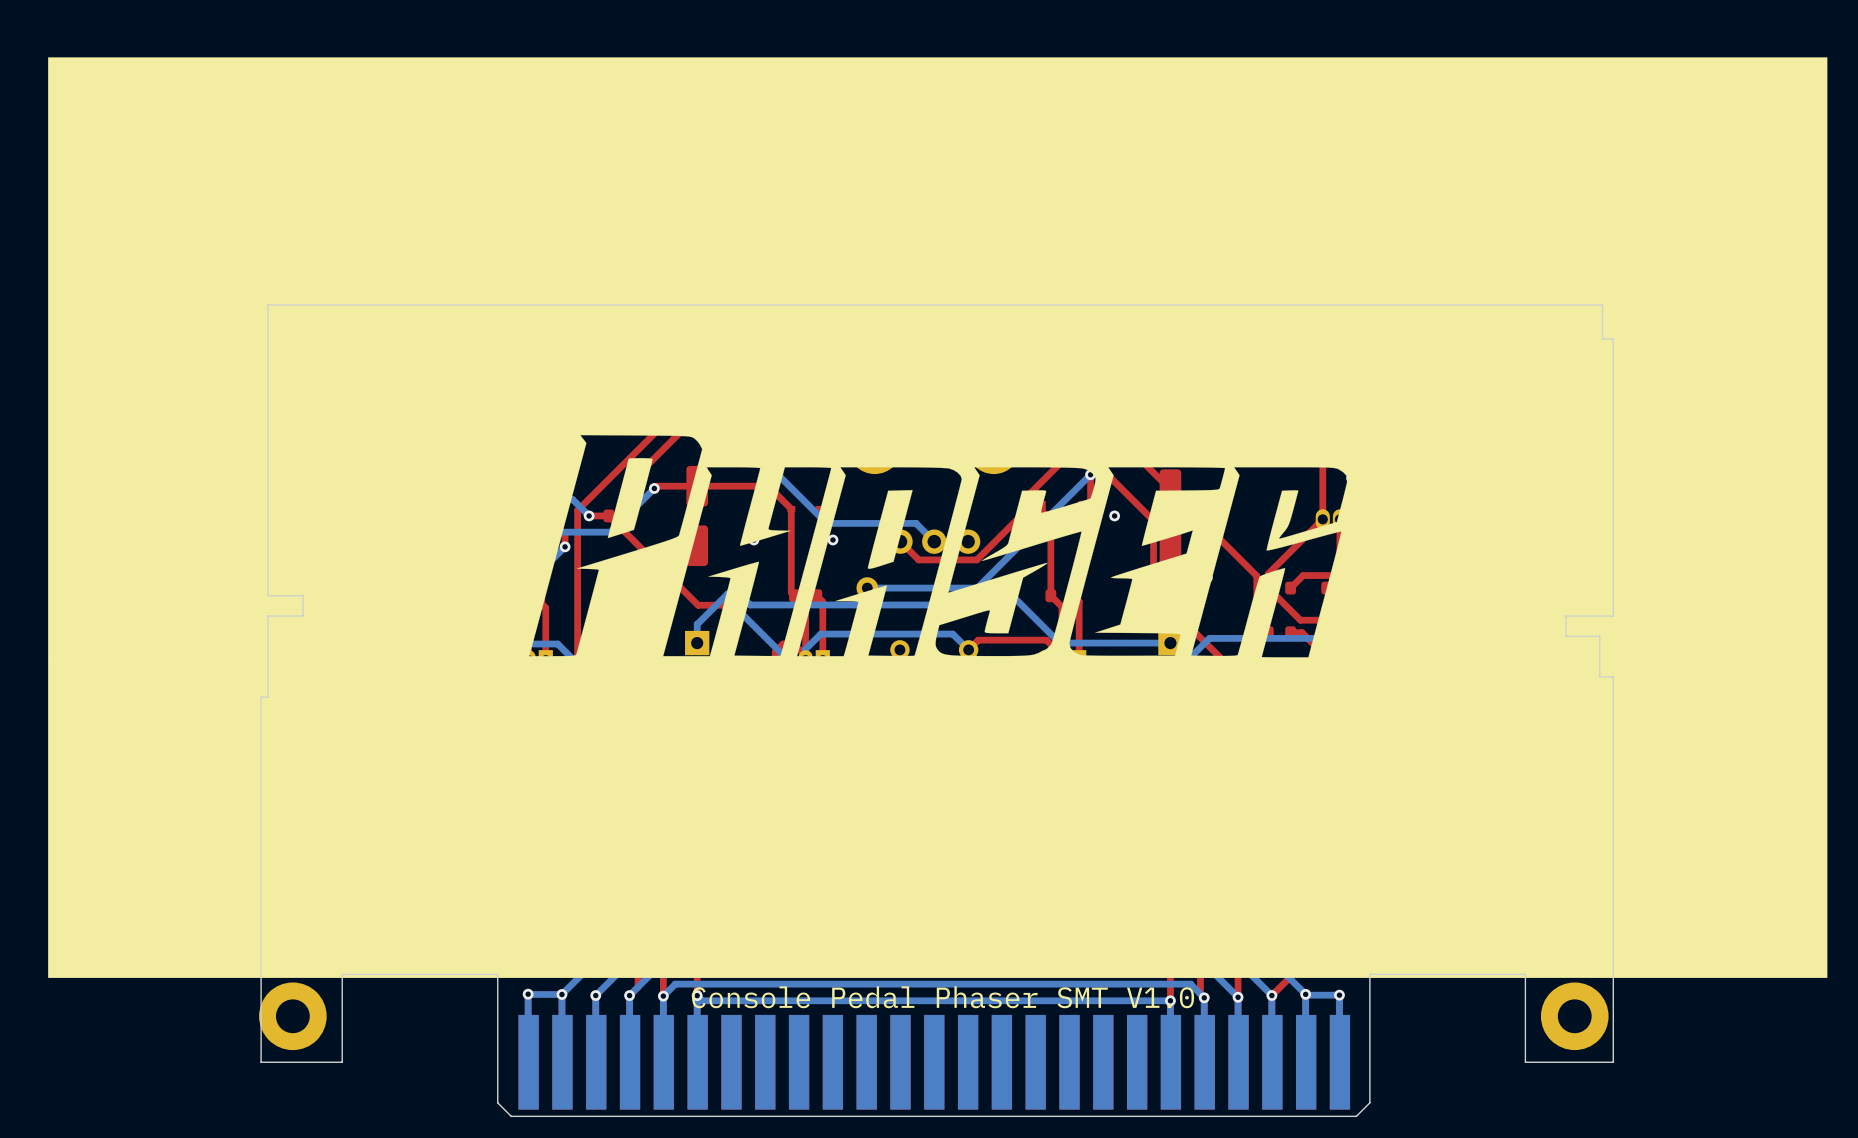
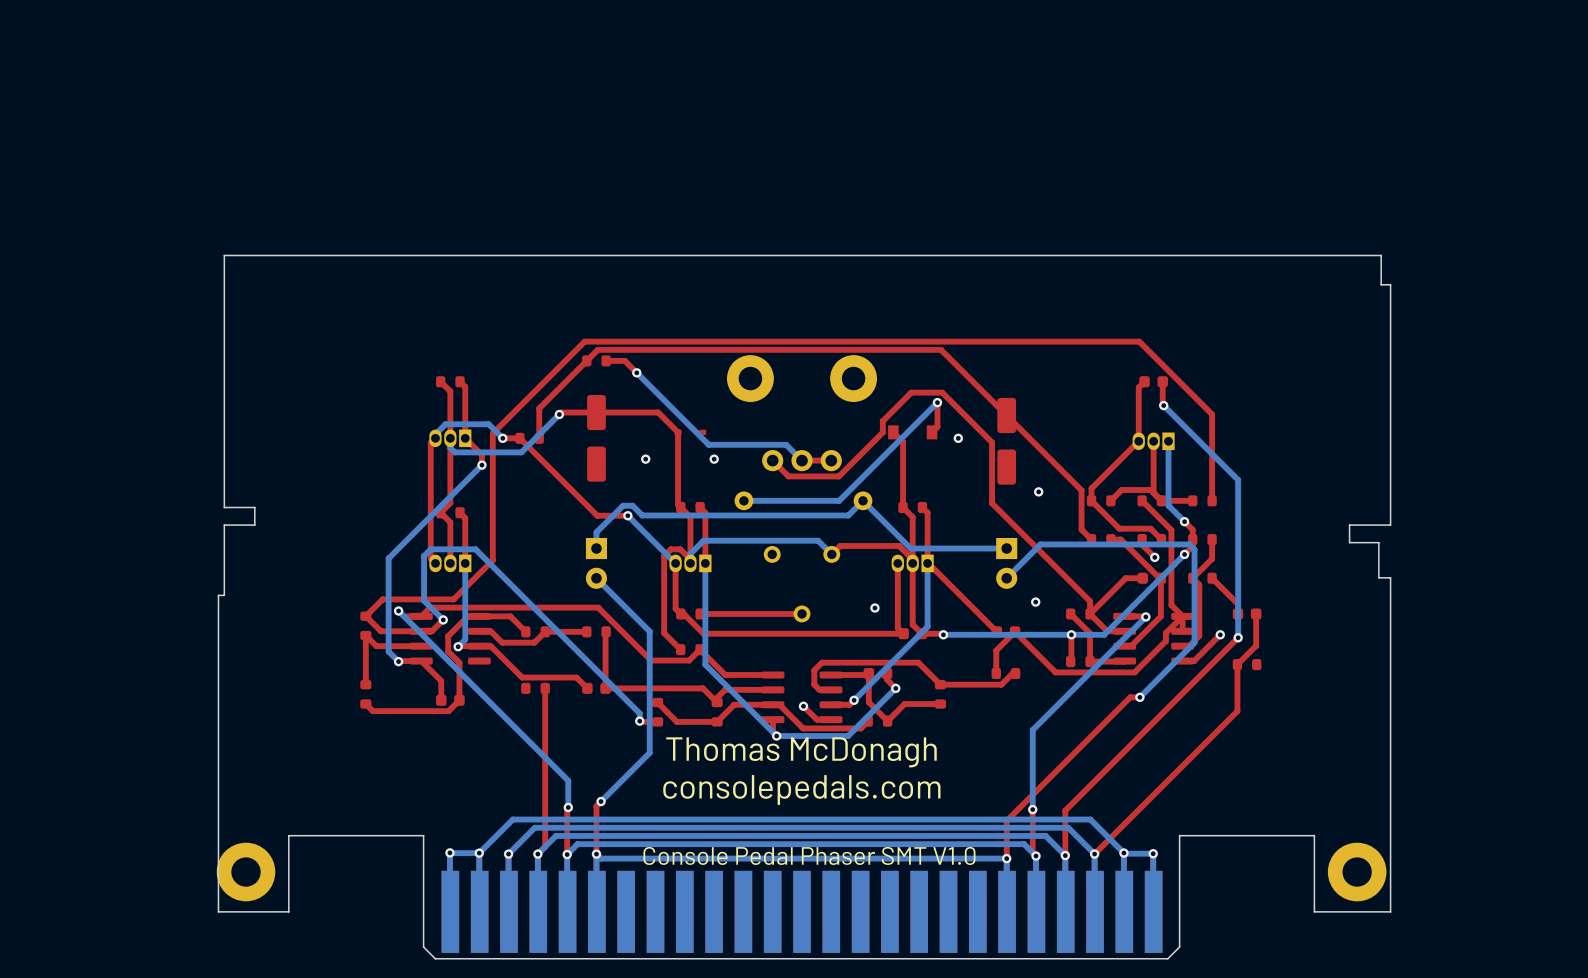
drawing: [48, 57, 1828, 978] -> none

